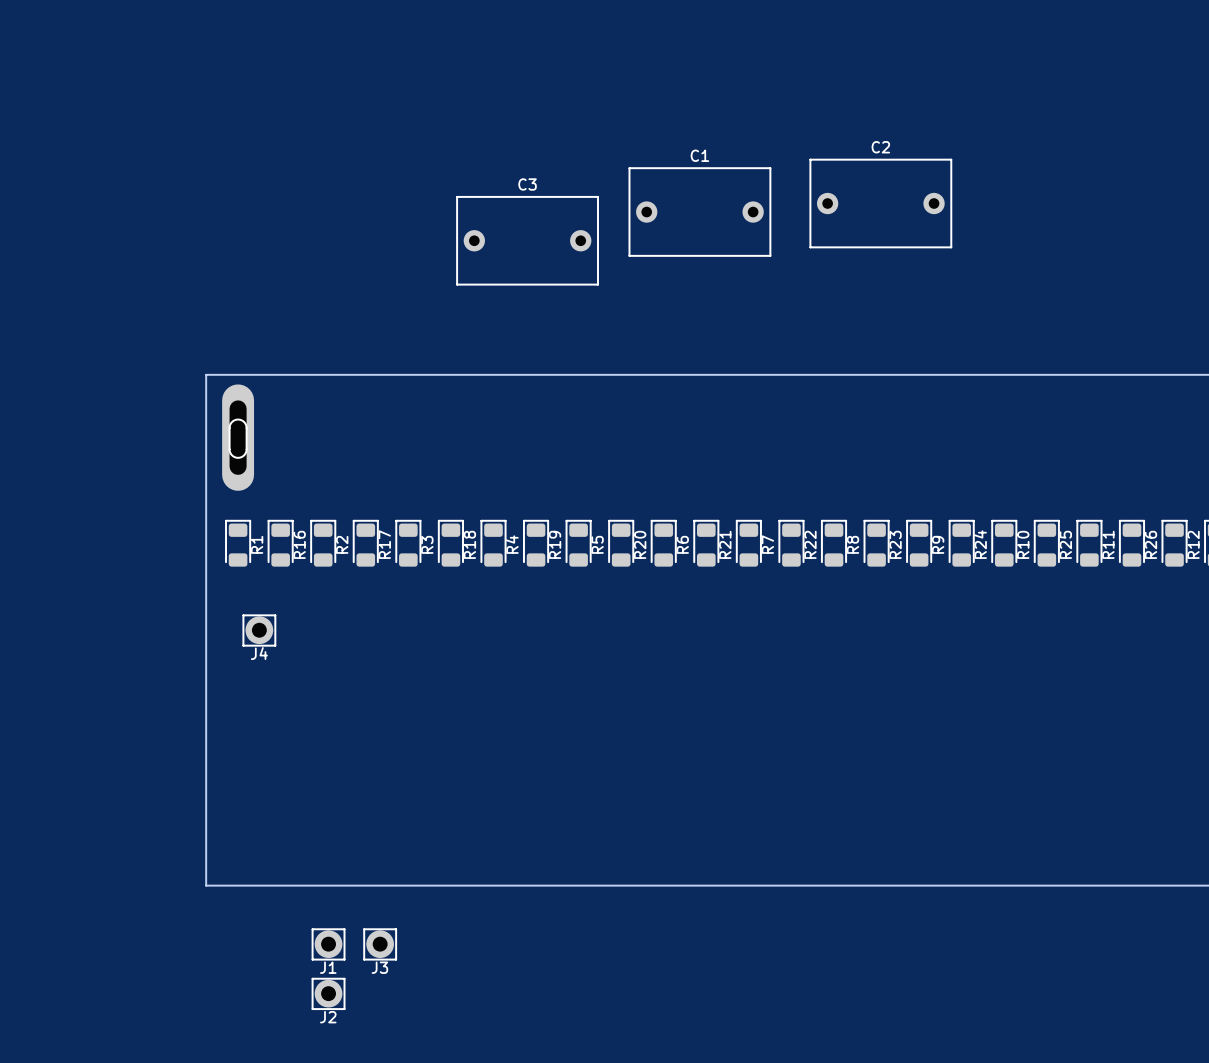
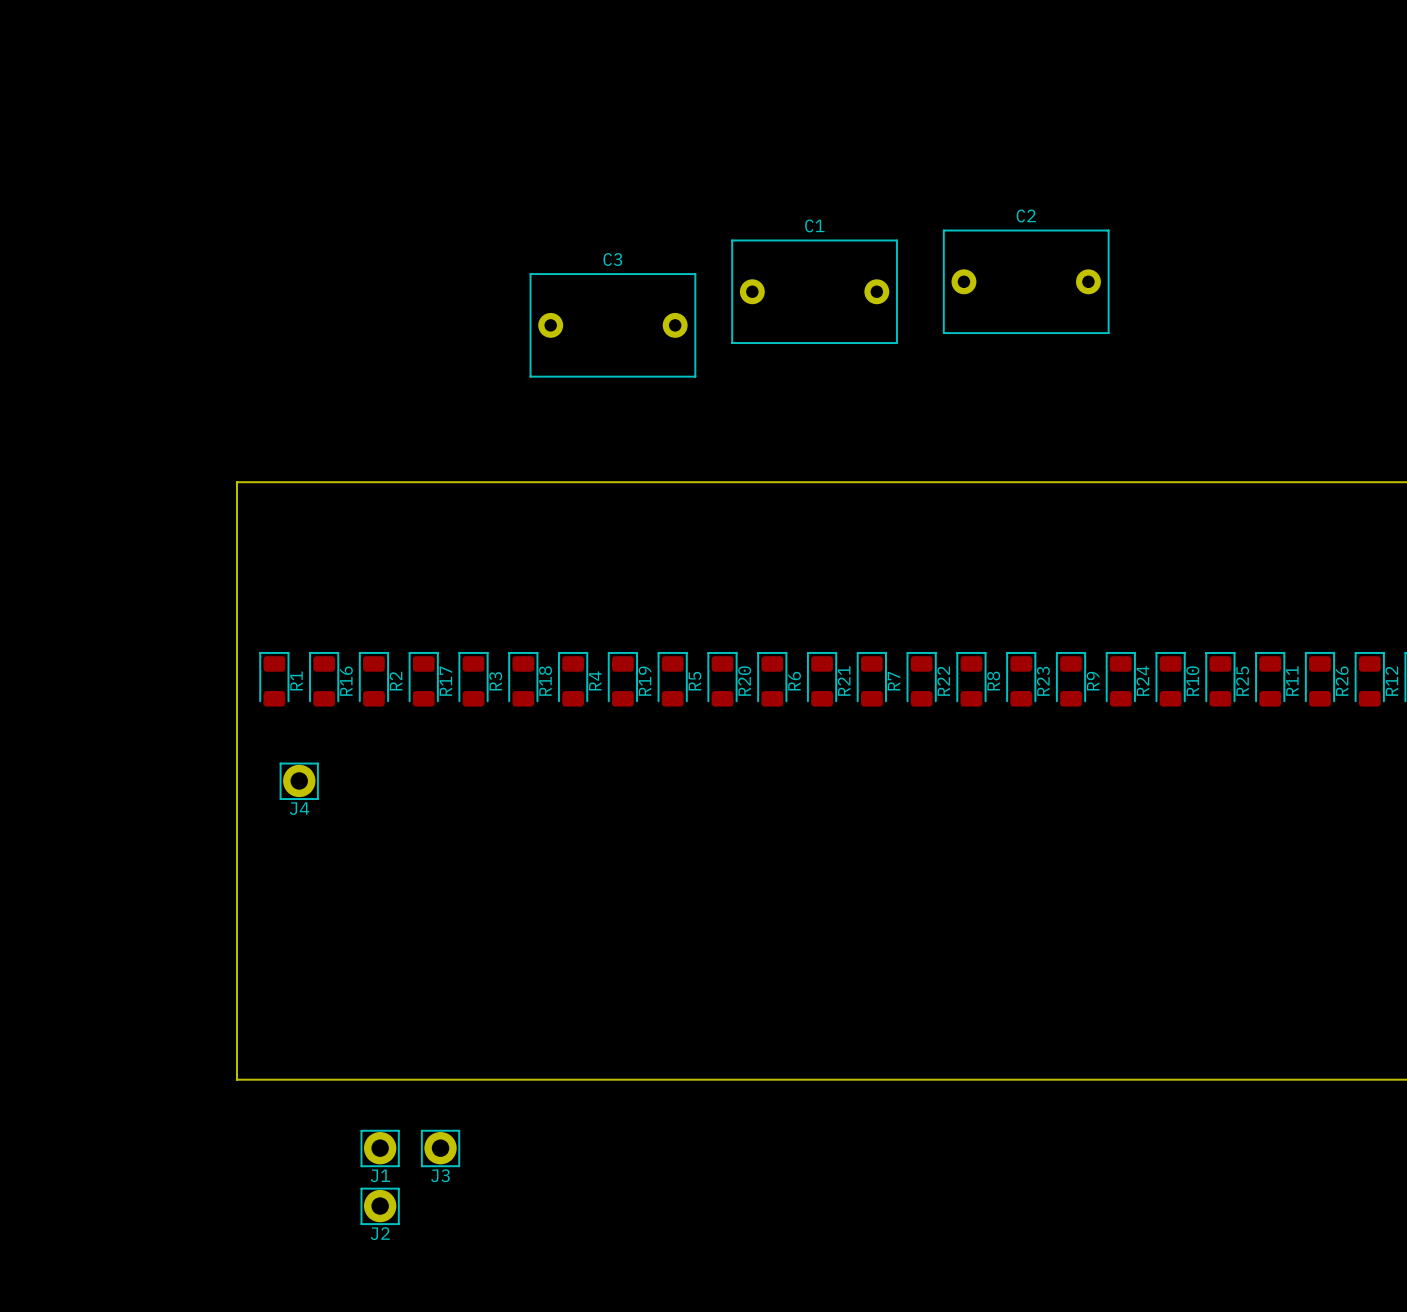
part: (238, 437) -> none

